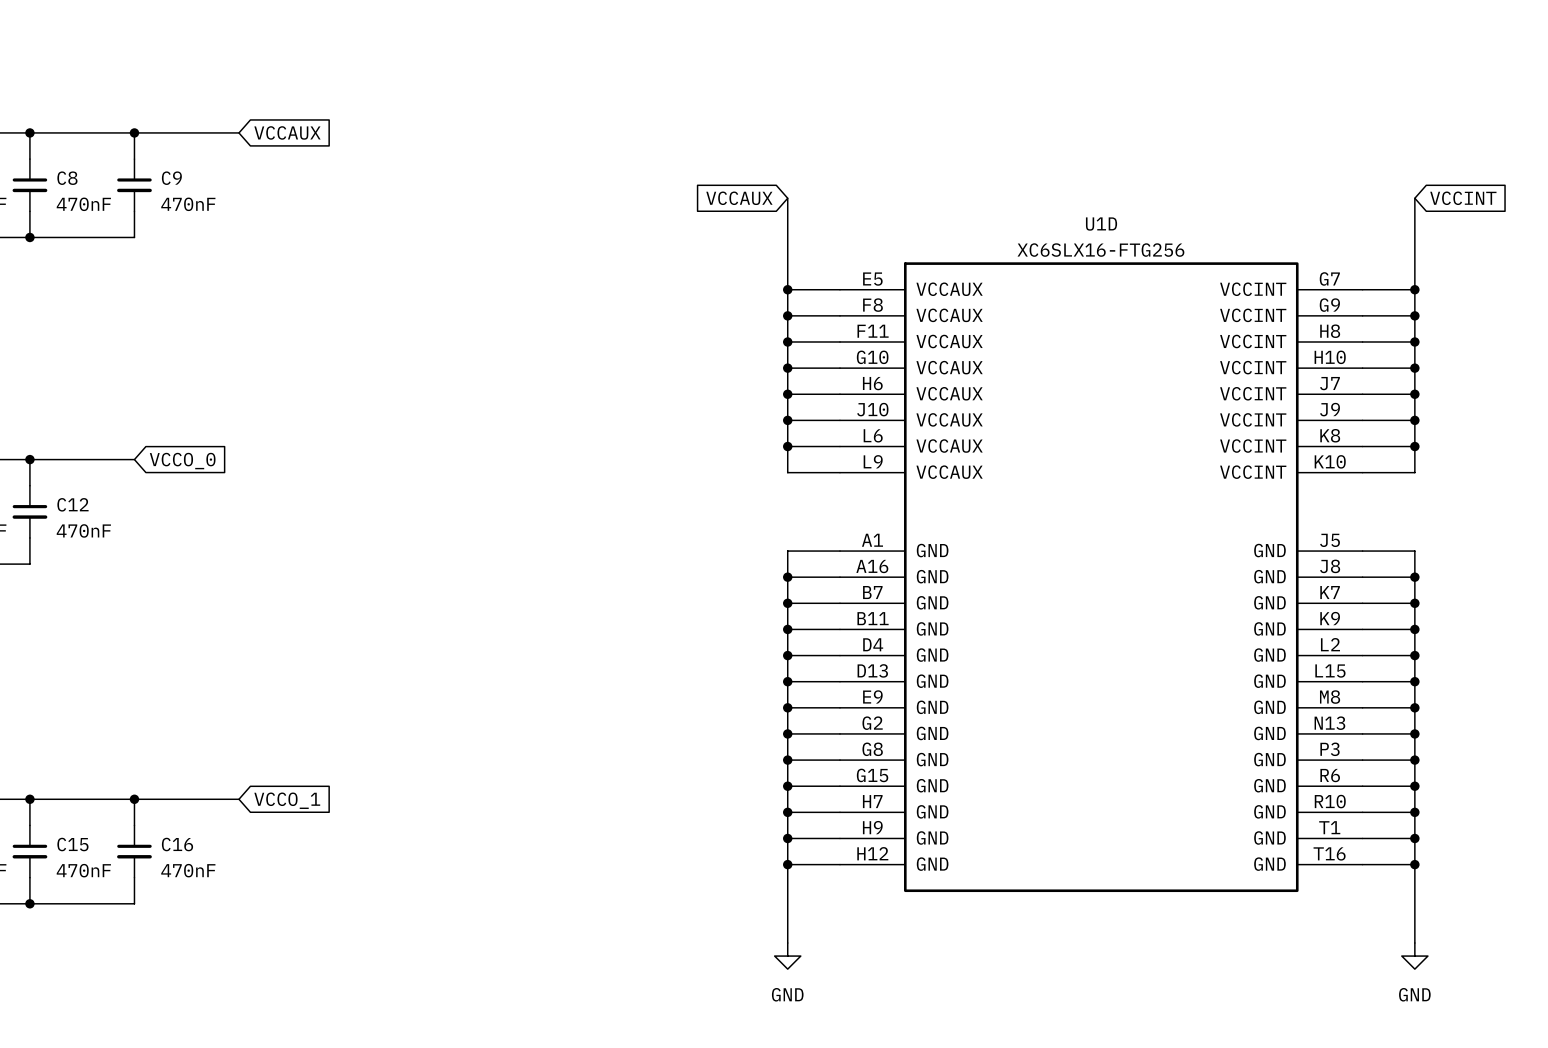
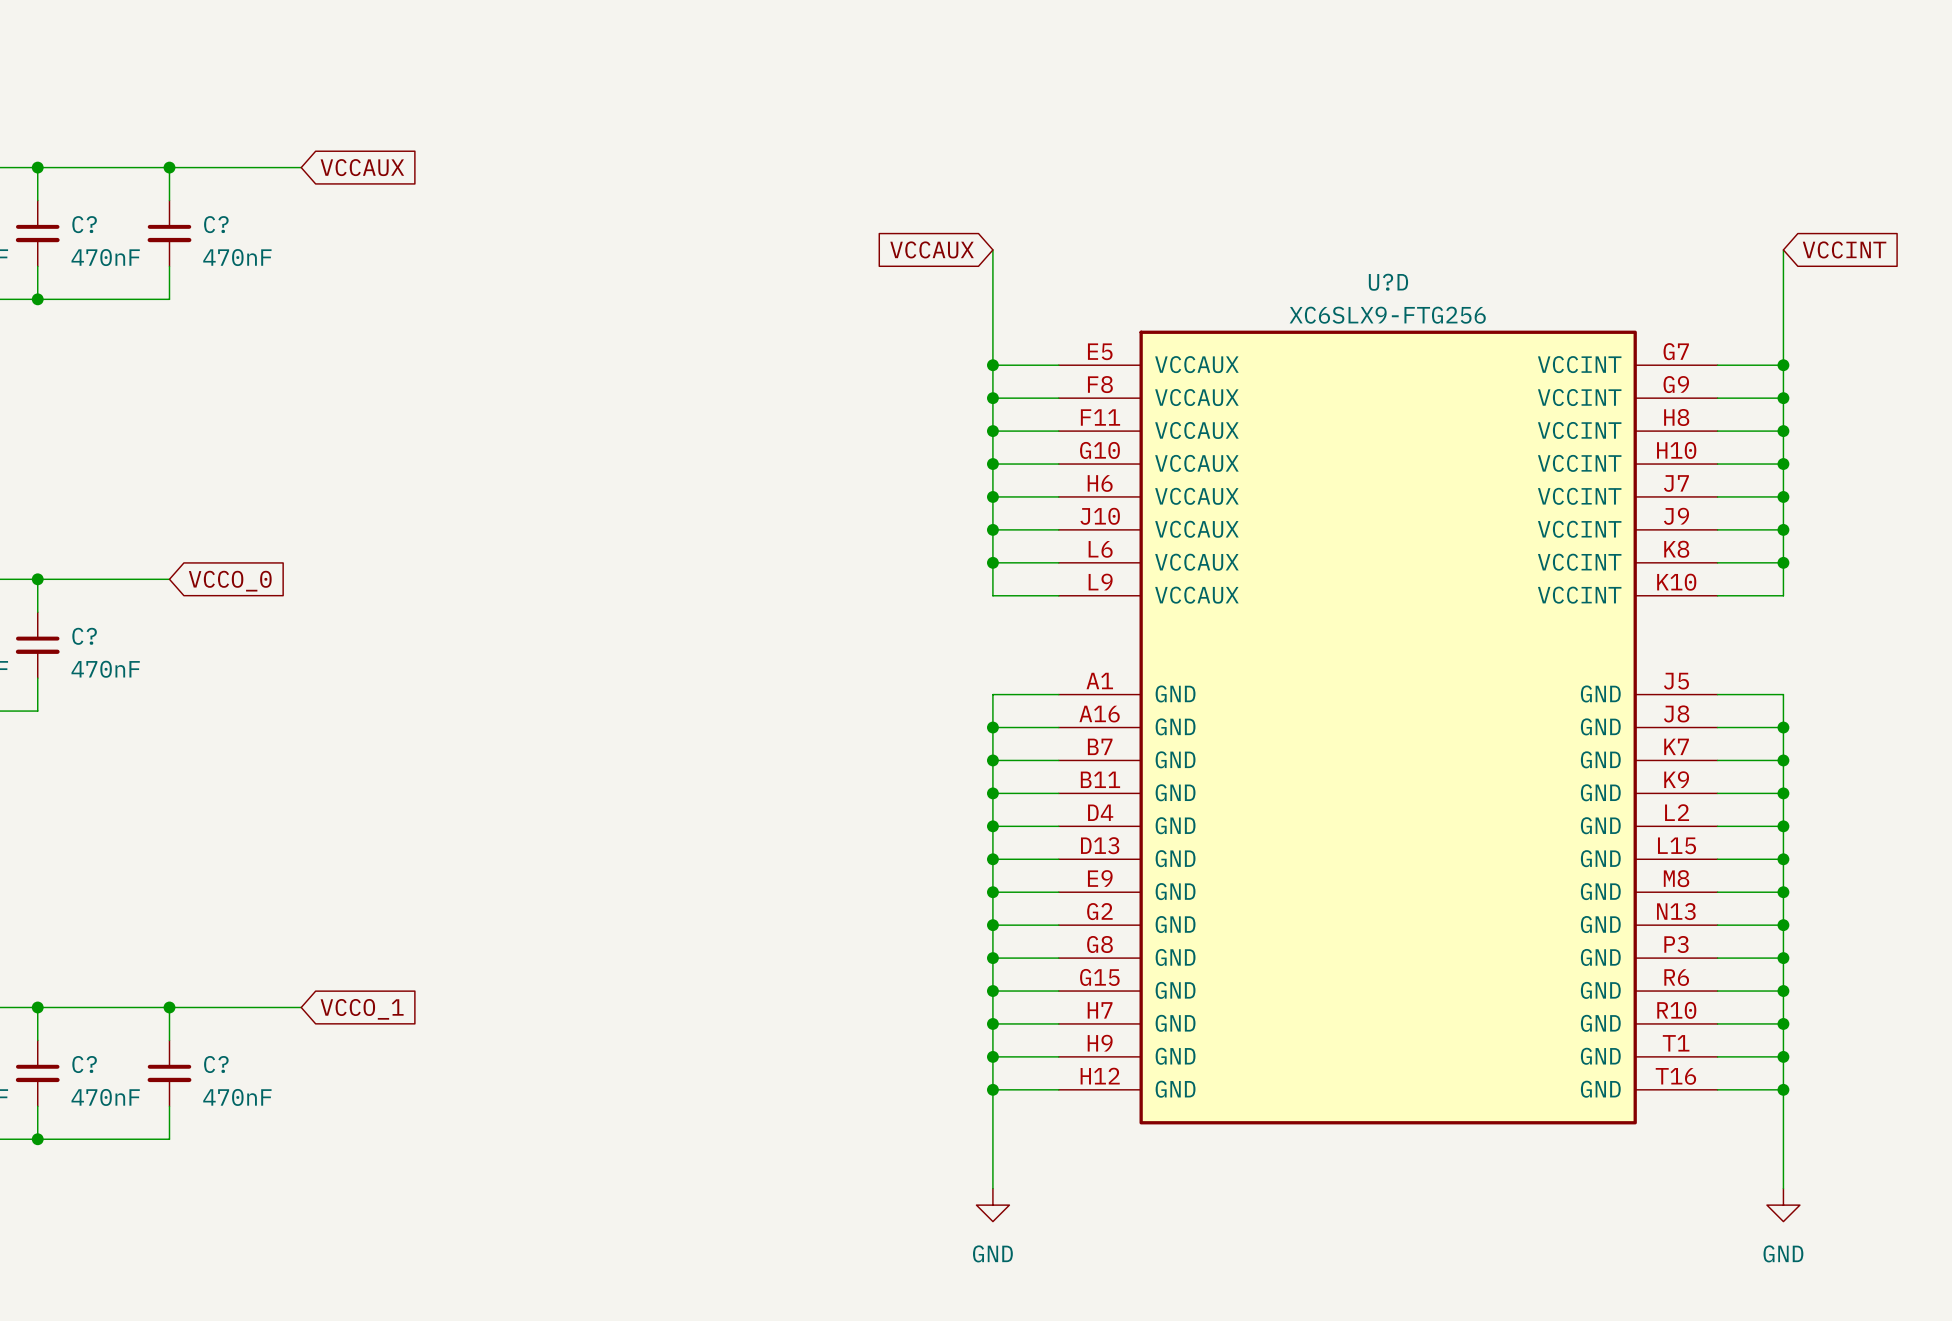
C8 name: C8 (67, 178) -> C? (84, 224)
C9 name: C9 (171, 178) -> C? (216, 224)
U1D name: U1D (1101, 224) -> U?D (1388, 282)
U1D value: XC6SLX16-FTG256 (1100, 250) -> XC6SLX9-FTG256 (1387, 315)
C12 name: C12 (72, 504) -> C? (84, 636)
C15 name: C15 (72, 844) -> C? (84, 1064)
C16 name: C16 (177, 844) -> C? (216, 1064)

